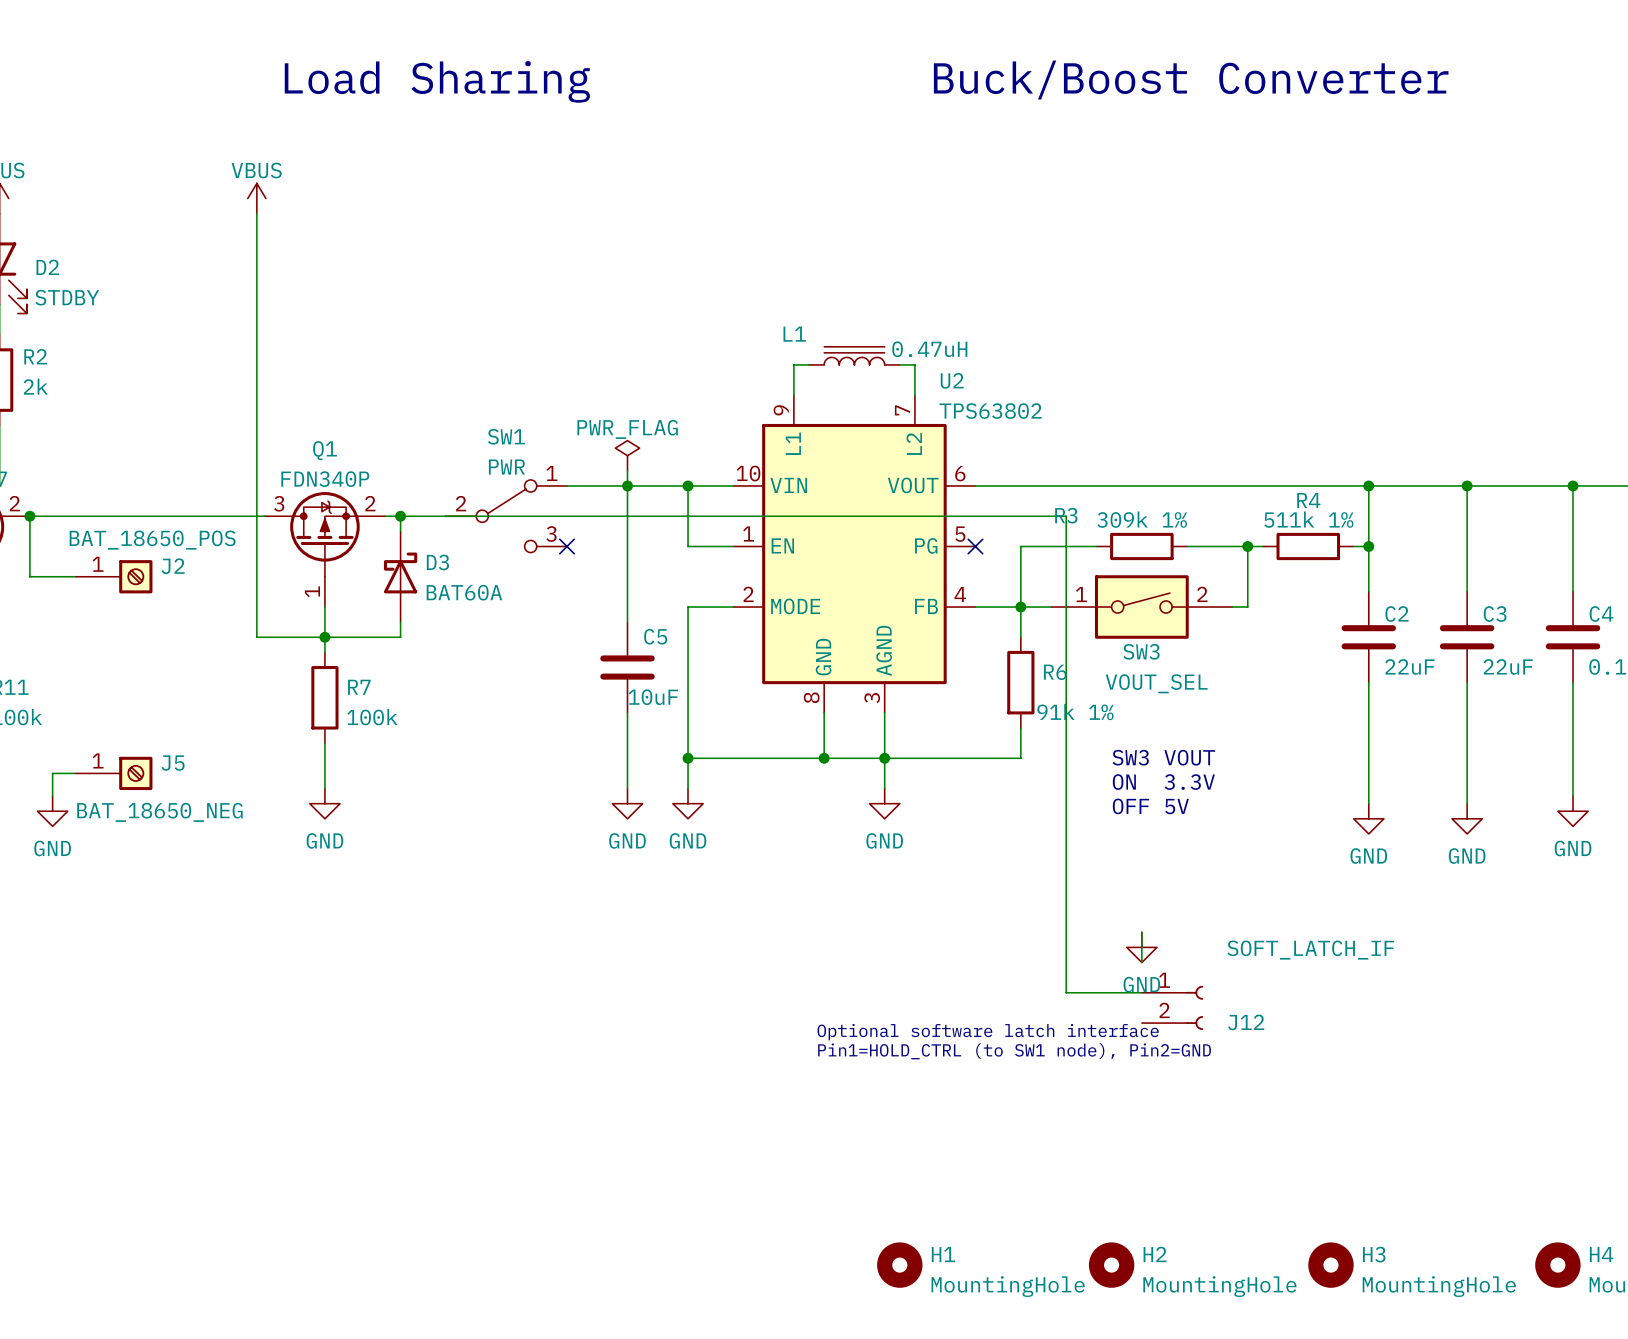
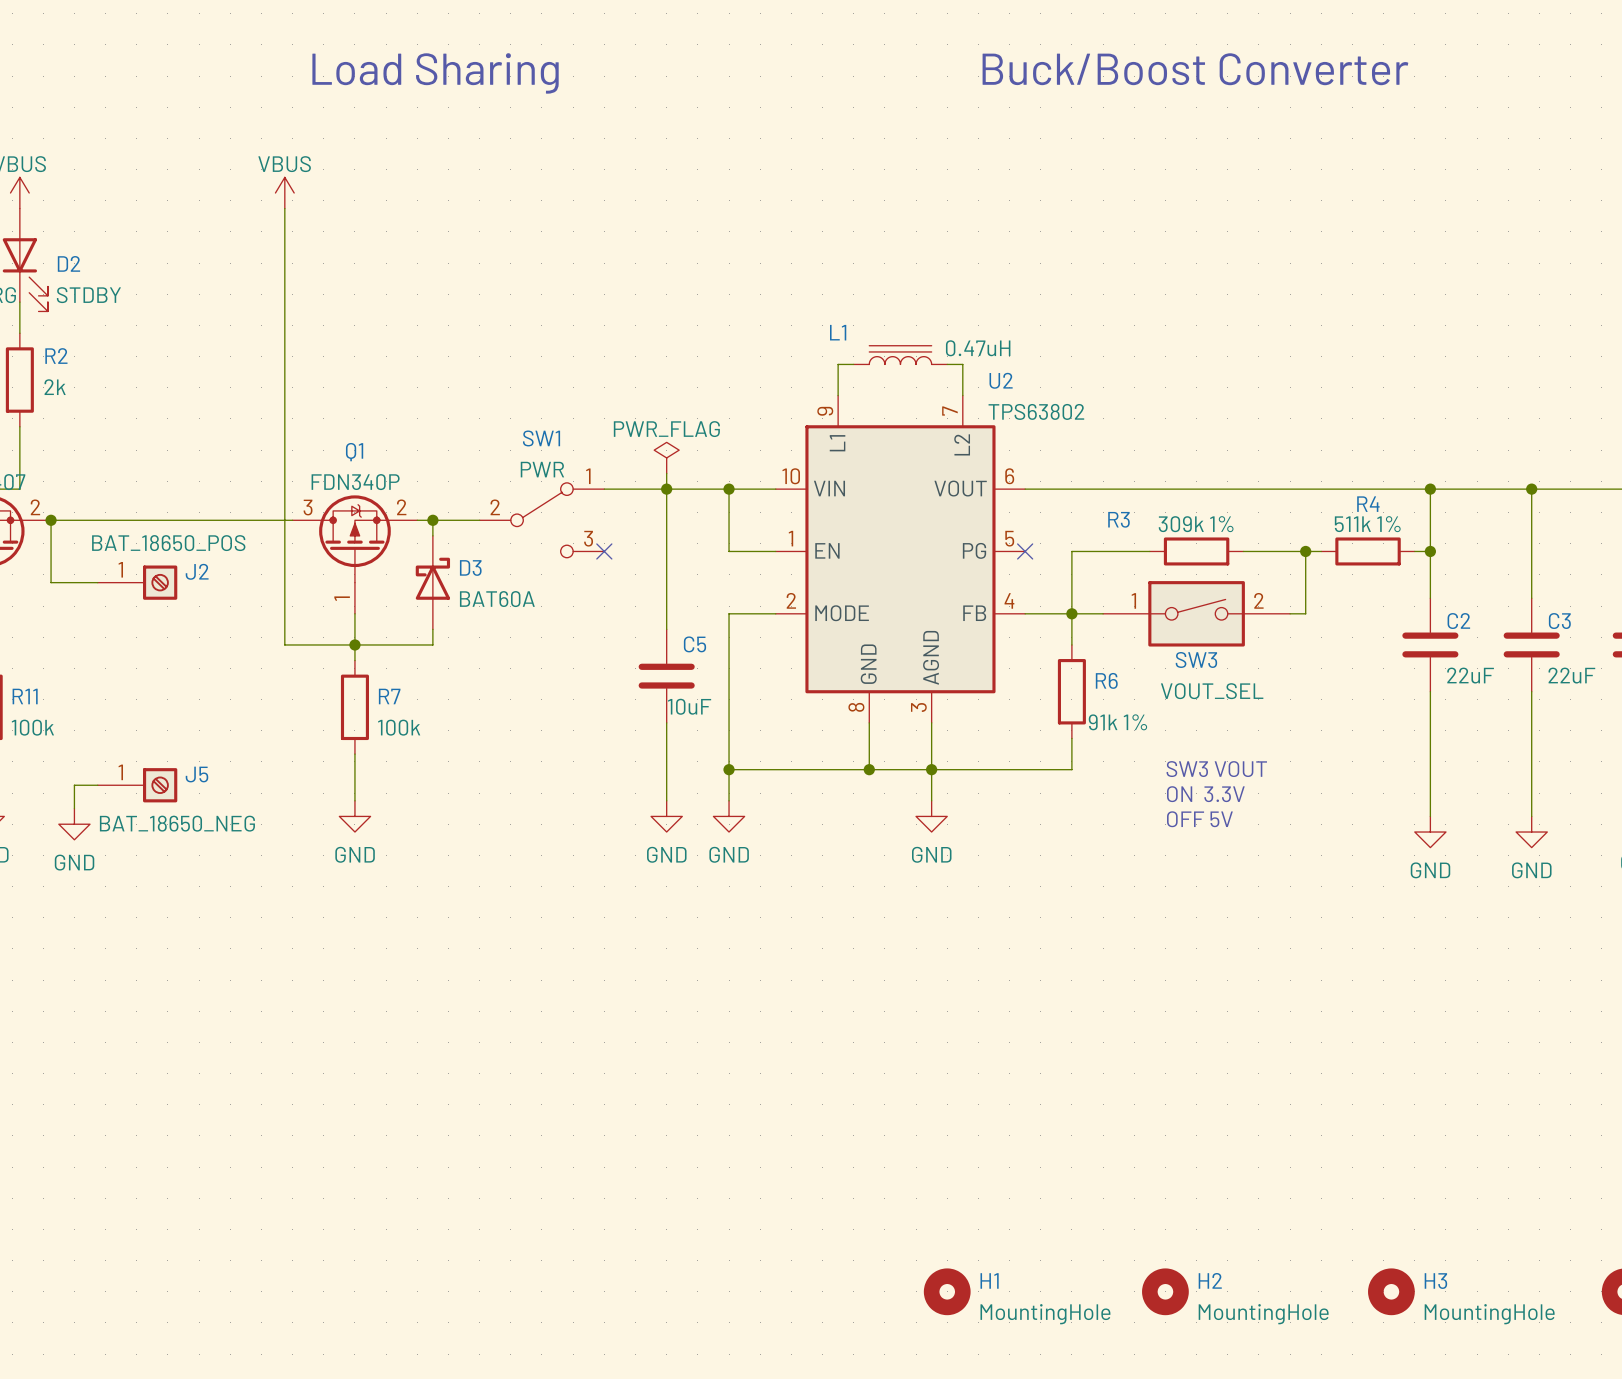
wire: (445, 516) (1066, 516) (1066, 992) (1141, 992) -> none
wire: (1141, 932) (1141, 962) -> none
power symbol: GND (1141, 947) -> none
J12: SOFT_LATCH_IF (1172, 1007) -> none
text: Optional software latch interface (988, 1032) -> none
text: Pin1=HOLD_CTRL (to SW1 node), Pin2=GND (1014, 1051) -> none

